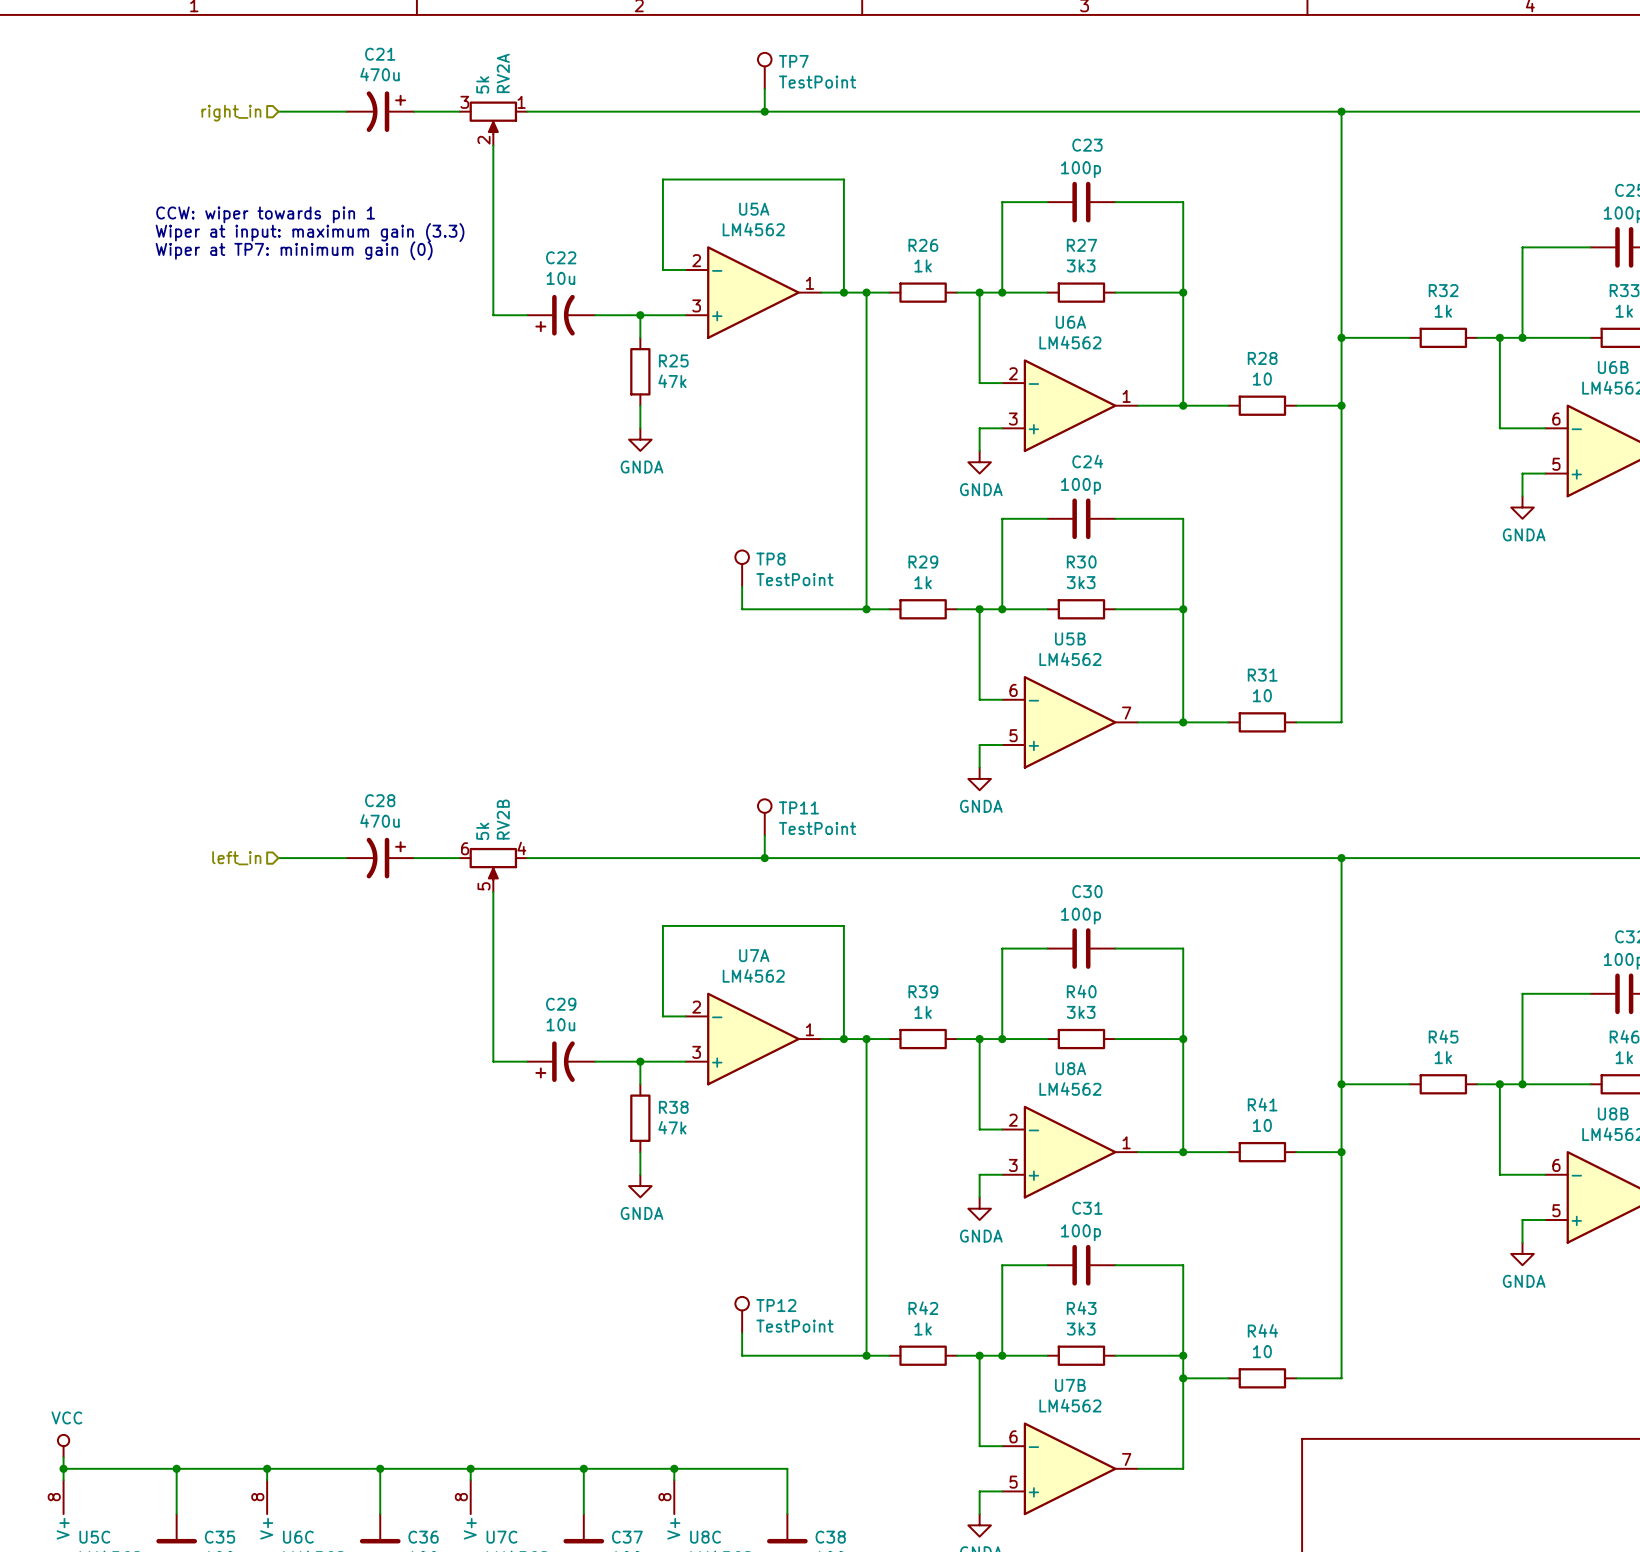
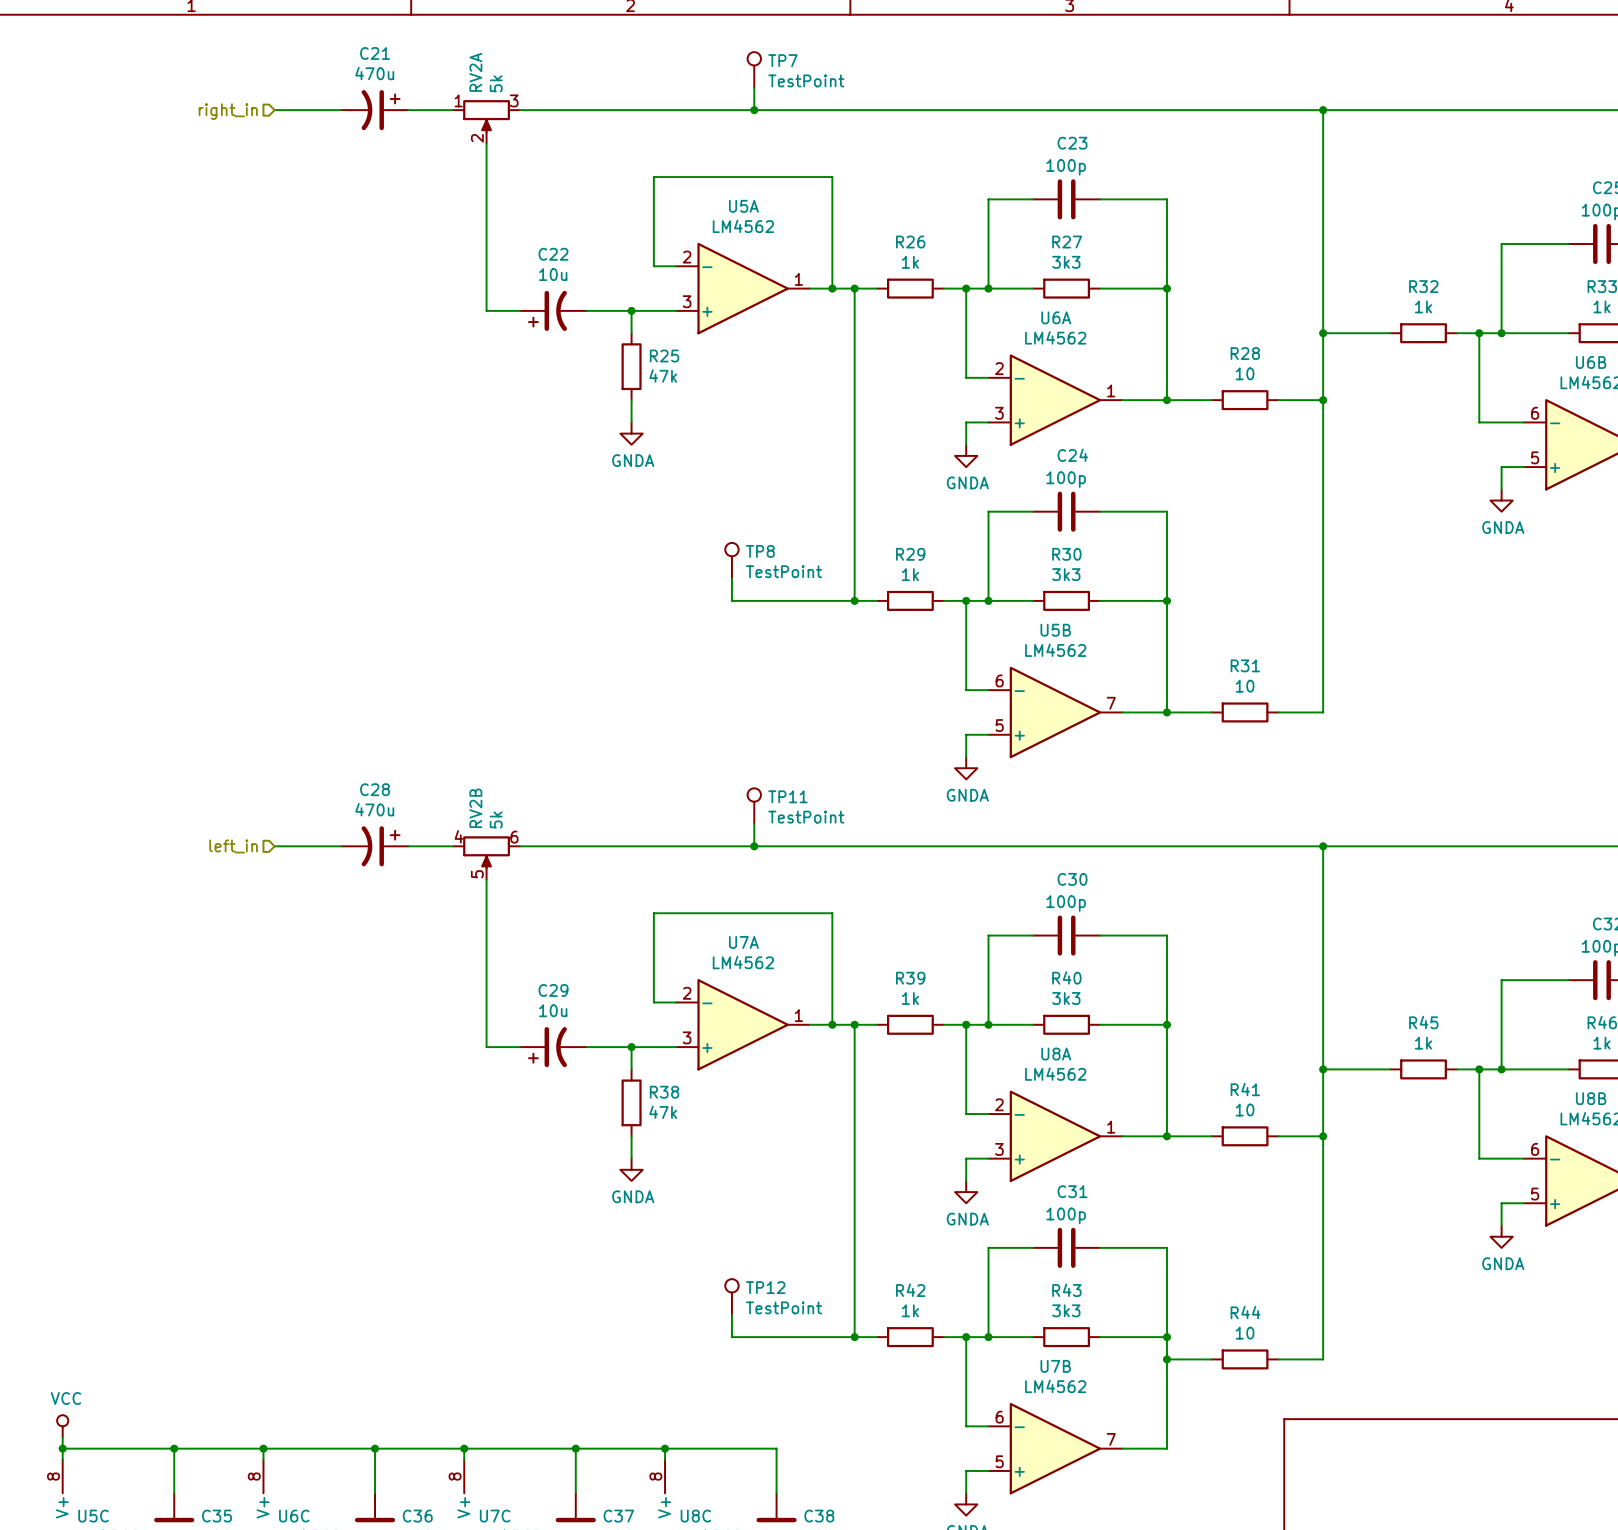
RV2A flip: as is (493, 117) -> left-right (486, 116)
text: CCW: wiper towards pin 1 (265, 214) -> none
text: Wiper at input: maximum gain (3.3) (310, 232) -> none
text: Wiper at TP7: minimum gain (0) (294, 250) -> none
RV2B flip: as is (493, 864) -> left-right (486, 852)

